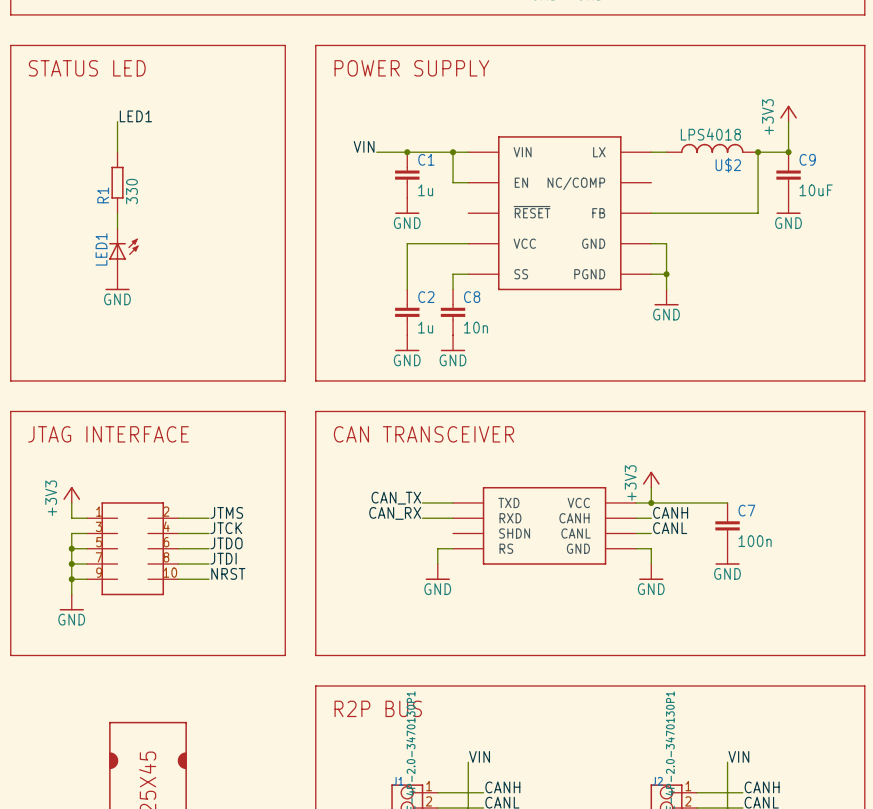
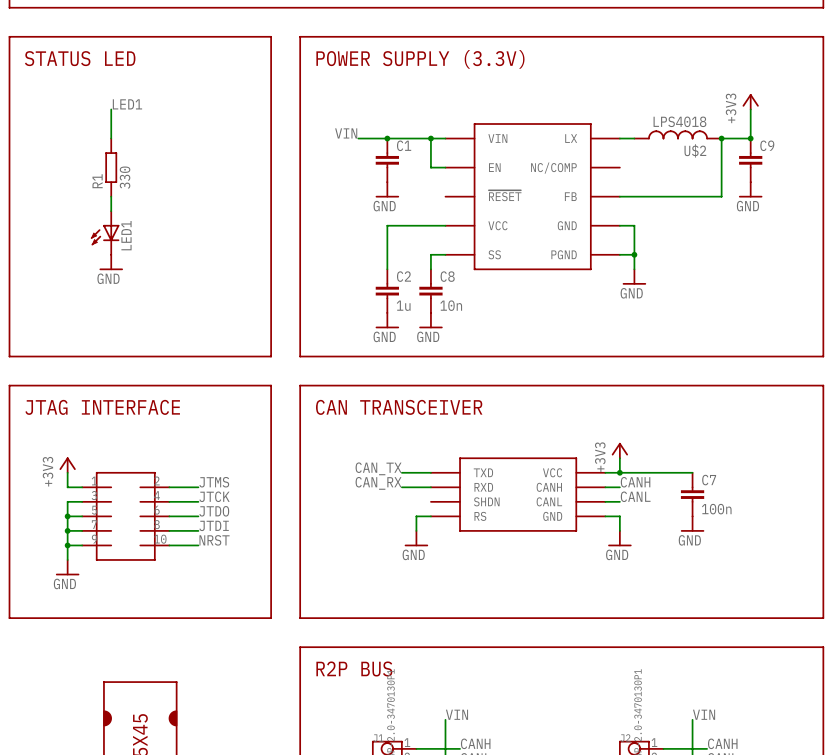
text: POWER SUPPLY (411, 68) -> POWER SUPPLY (3.3V) (420, 59)
C1 value: 1u (425, 190) -> none
C9 value: 10uF (816, 190) -> none
LED1 rotation: 0° (123, 249) -> 180° (105, 235)

